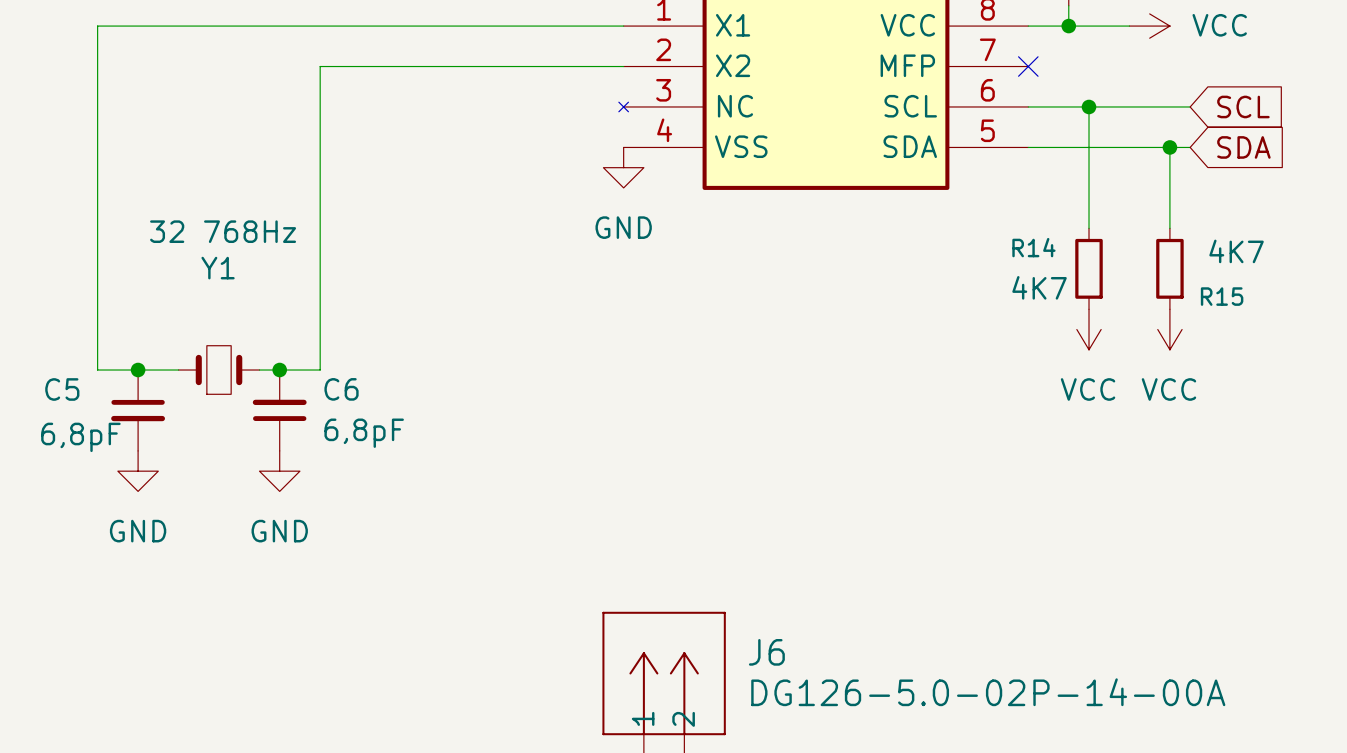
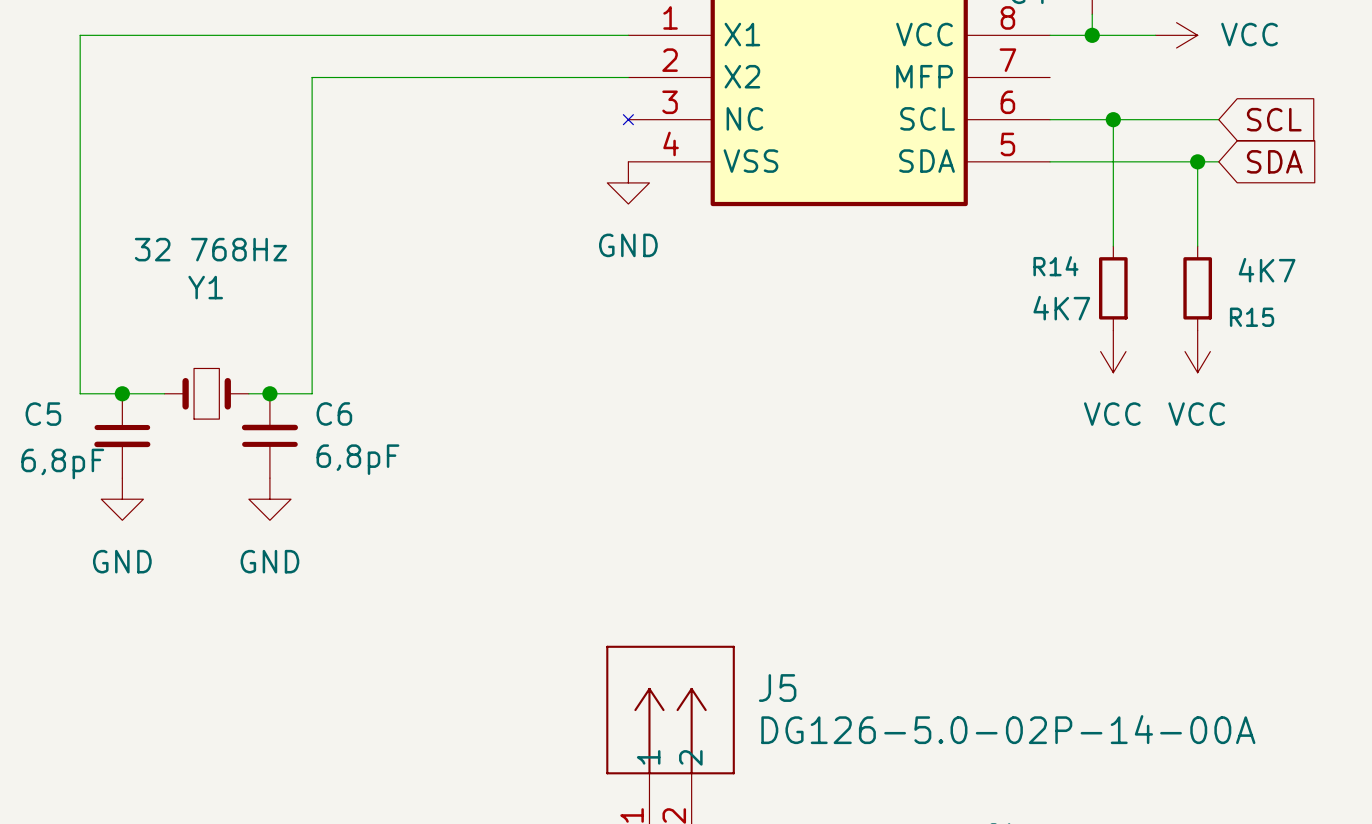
no-connect mark: (1028, 66) -> none
J6 name: J6 (766, 652) -> J5 (777, 688)

